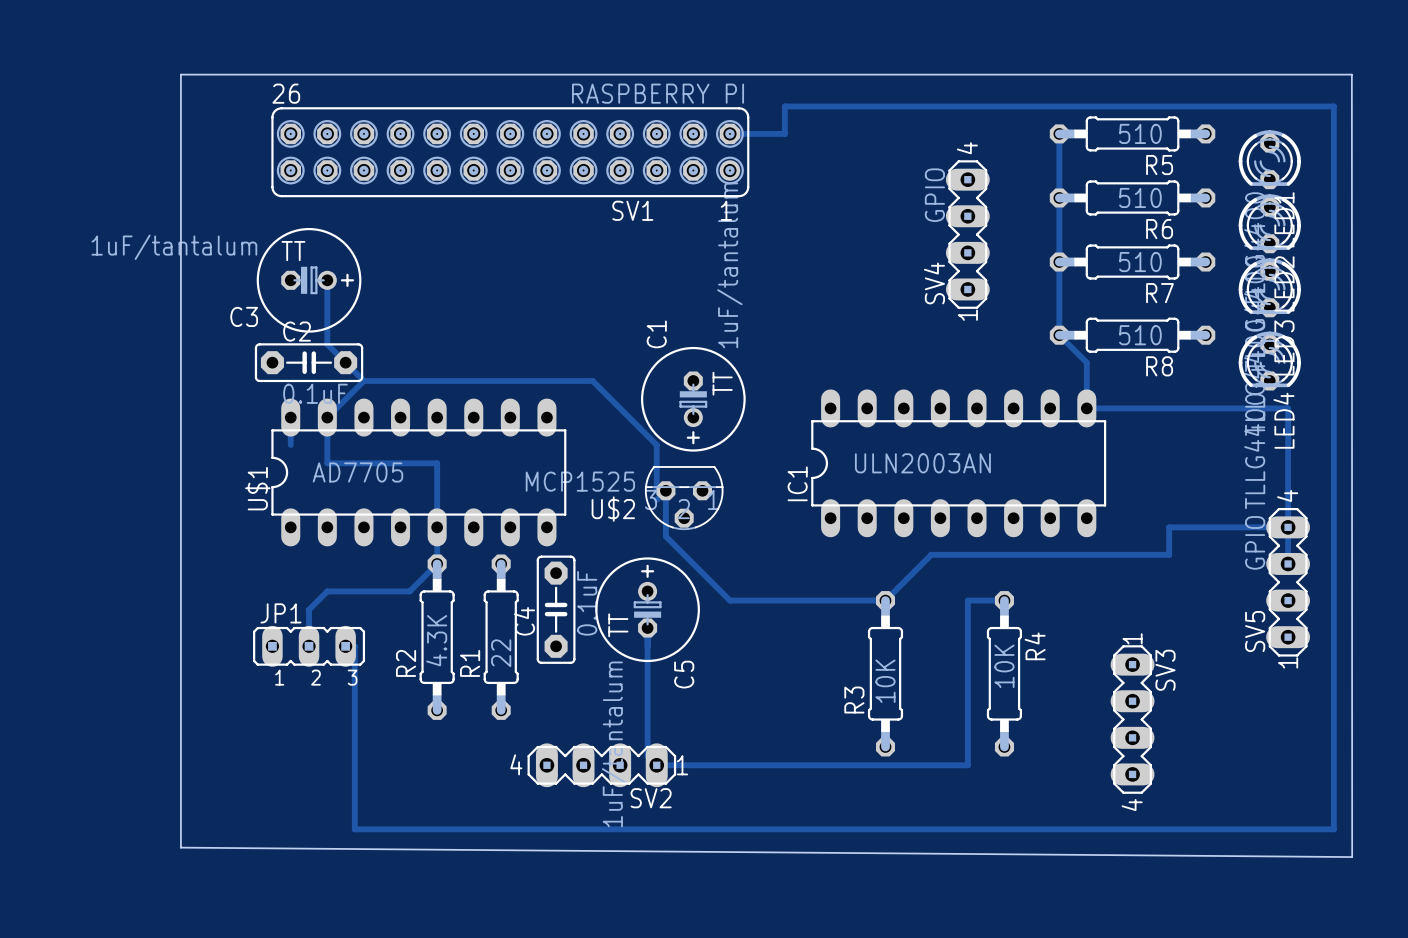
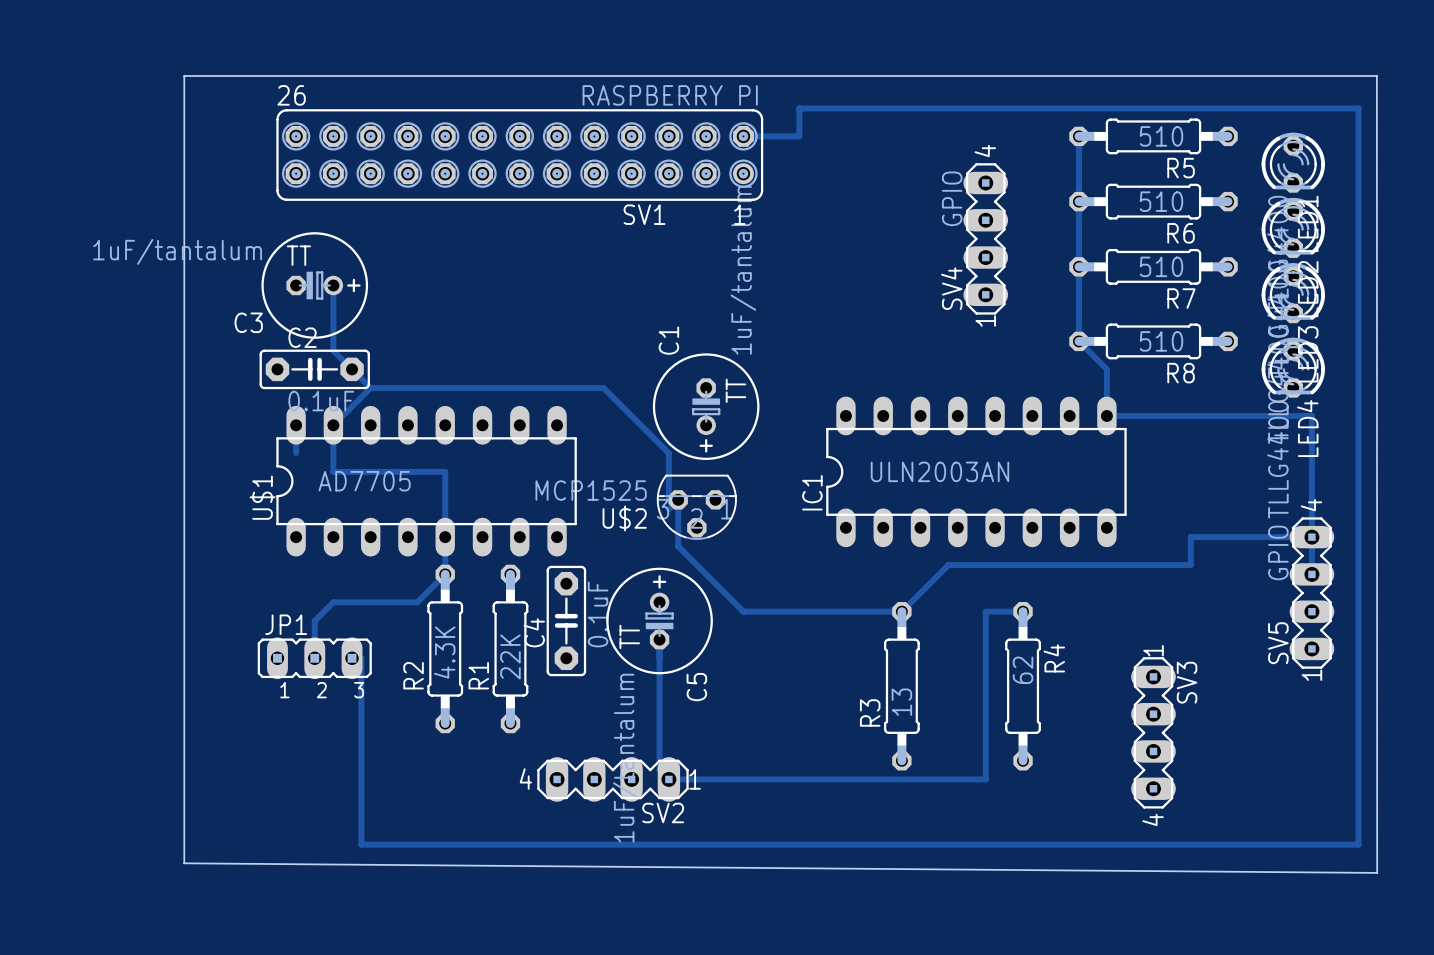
R1 value: 22 (501, 653) -> 22K (510, 656)
R4 value: 10K (1004, 666) -> 62 (1023, 670)
R3 value: 10K (885, 681) -> 13 (901, 702)

